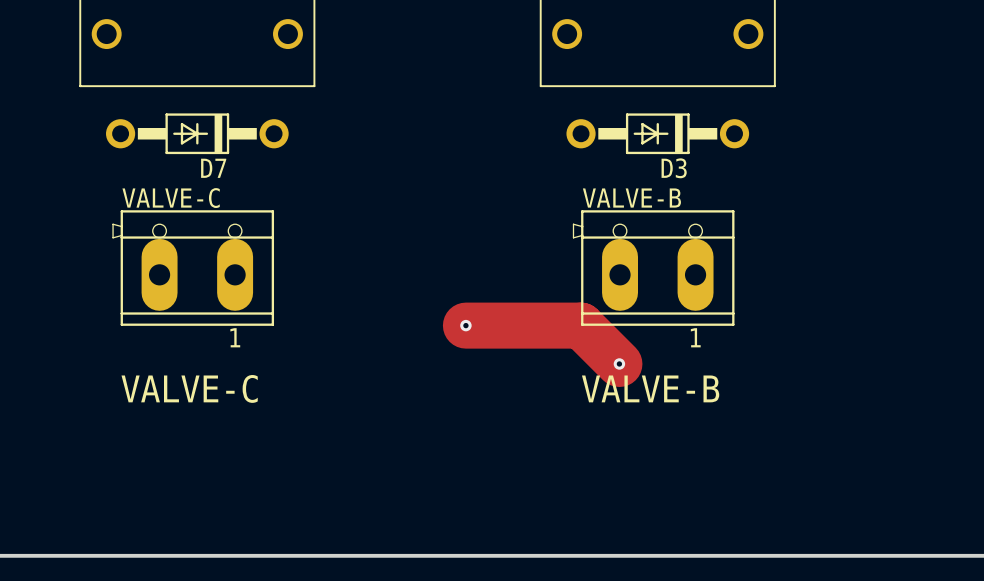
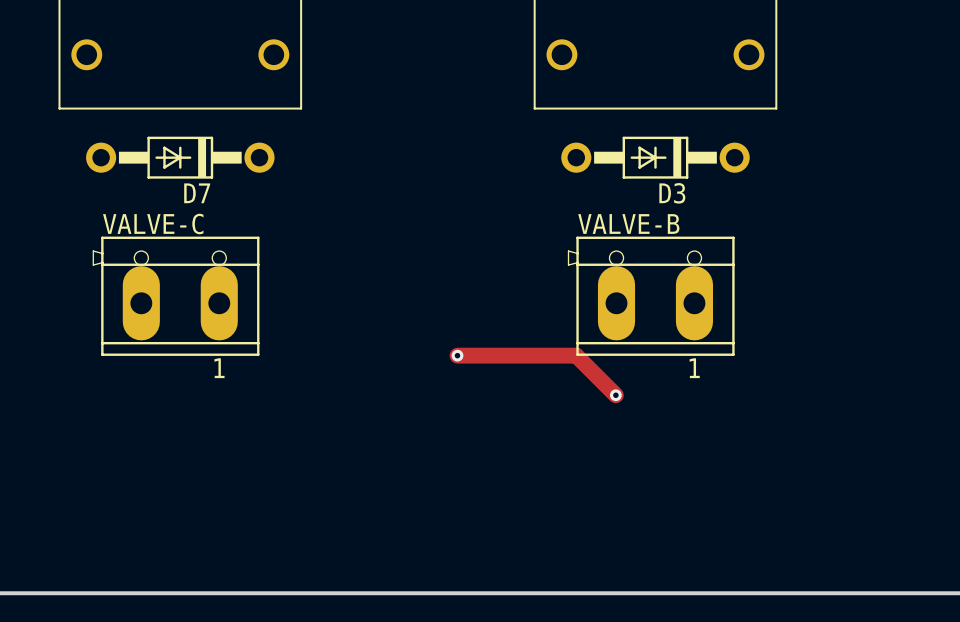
track width: thick (465, 325) (581, 325) (619, 363) -> thin (457, 355) (576, 355) (615, 395)
text: VALVE-C (189, 388) -> none
text: VALVE-B (650, 388) -> none

